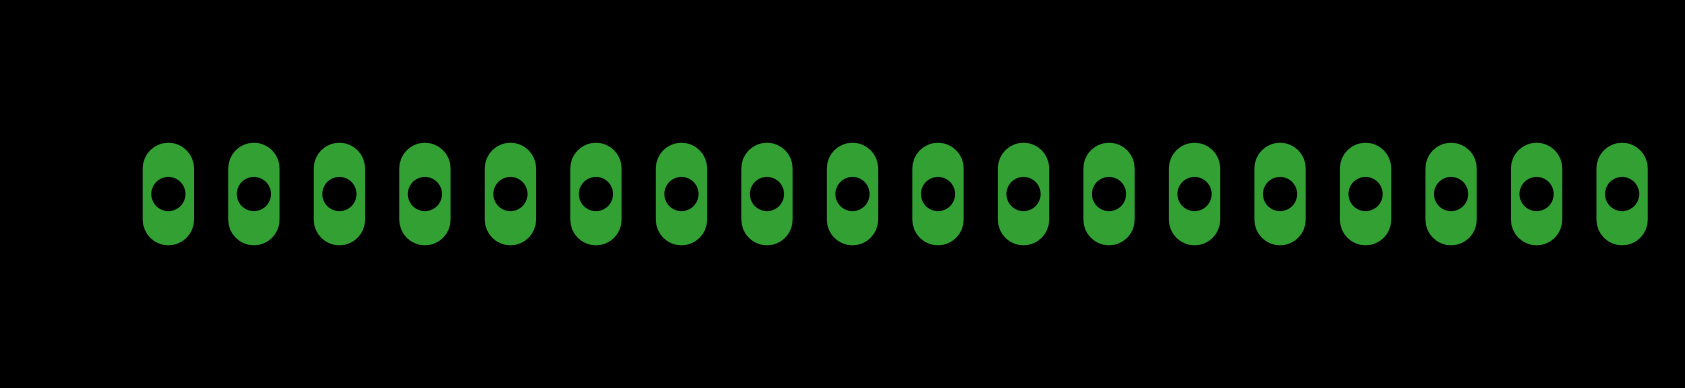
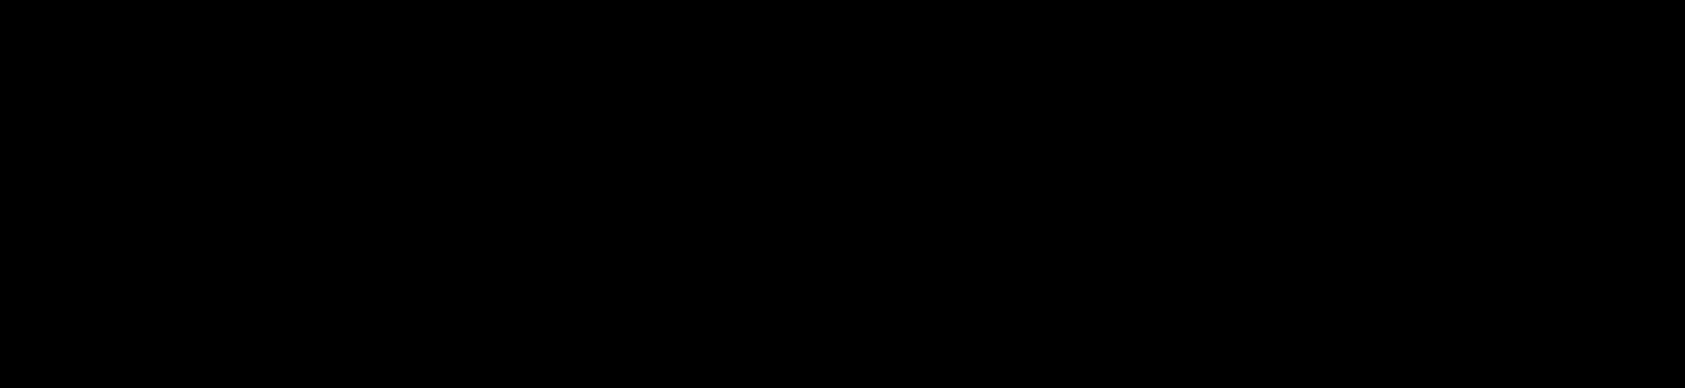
part: (895, 194) -> none

